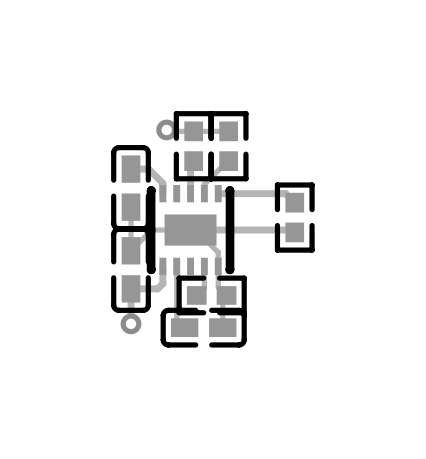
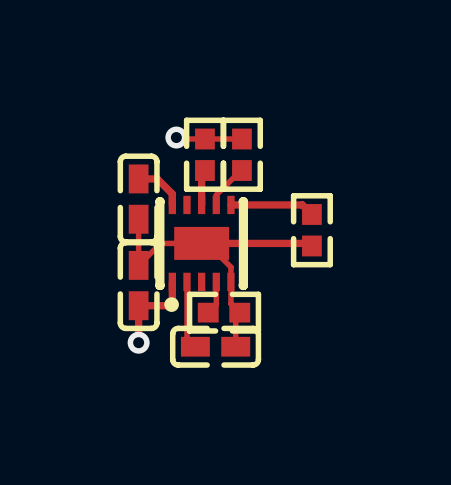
drawing: none -> [164, 297, 179, 312]

